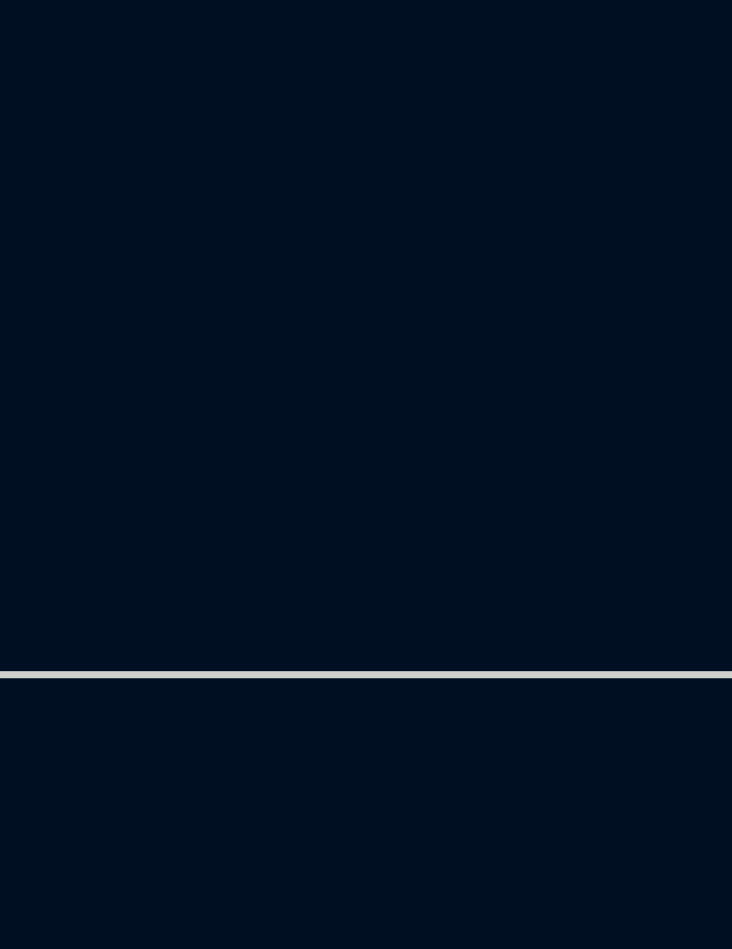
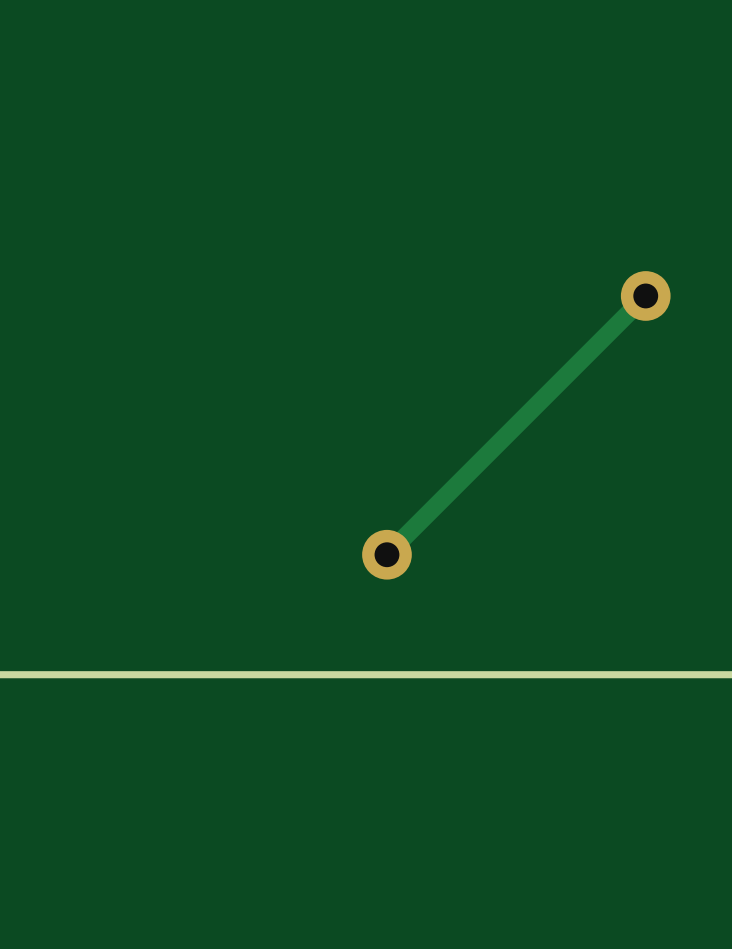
track: none -> (645, 295) (386, 554)
via: none -> (645, 295)
via: none -> (386, 554)

